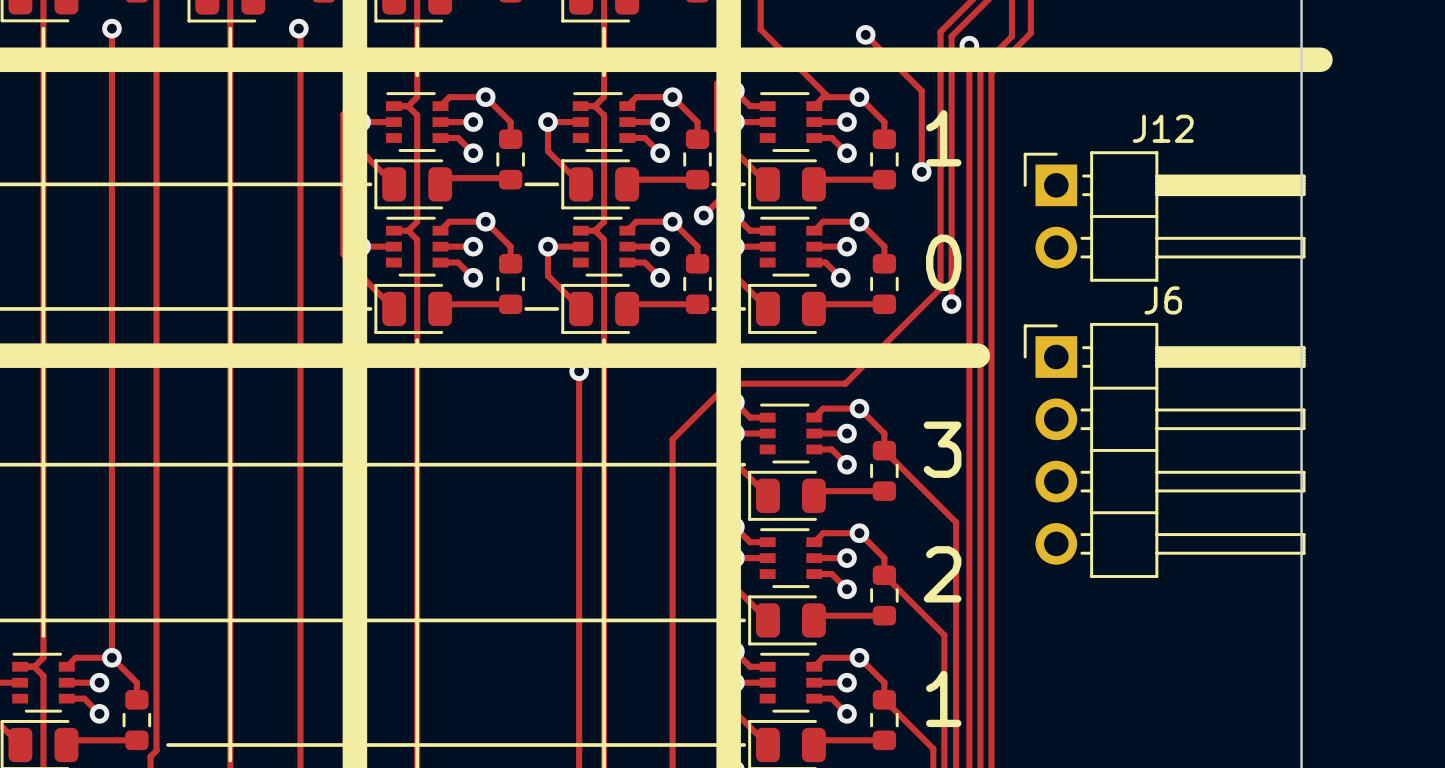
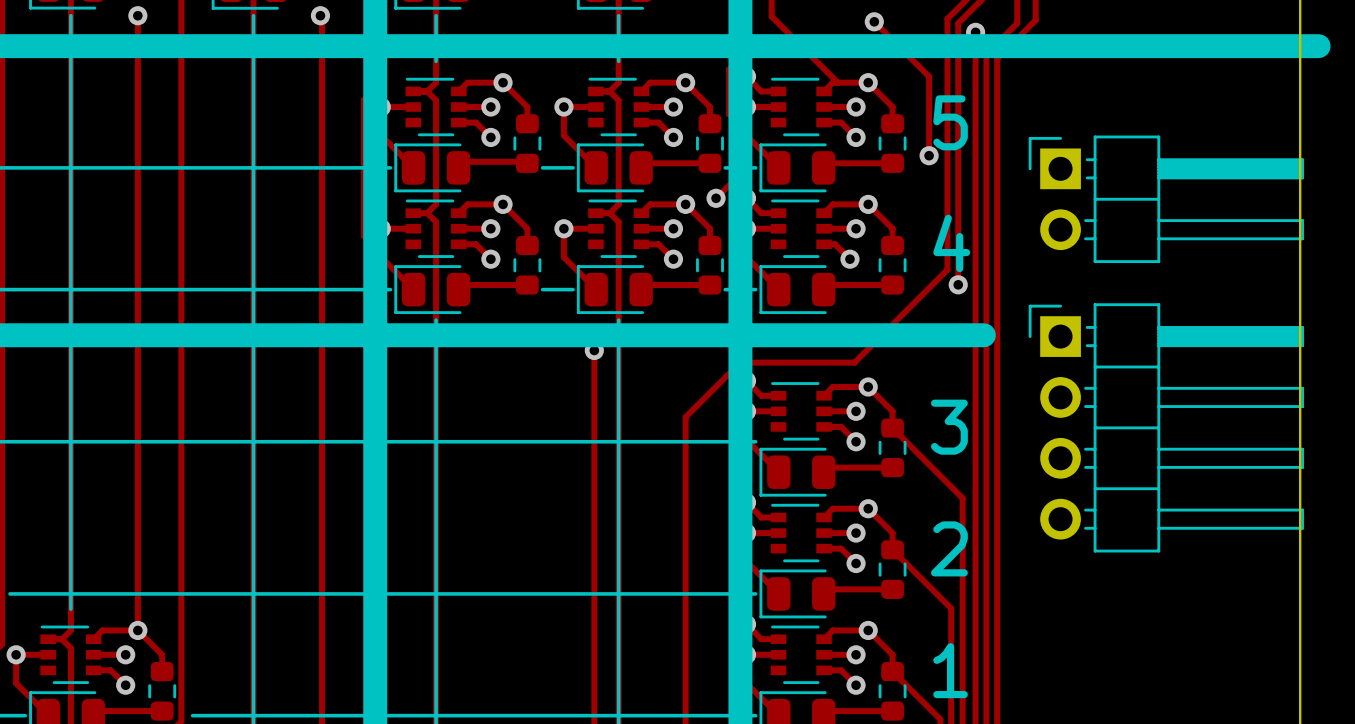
J12 name: J12 (1163, 128) -> none
text: 1 (943, 138) -> 5 (950, 122)
text: 0 (943, 262) -> 4 (951, 243)
J6 name: J6 (1163, 300) -> none

